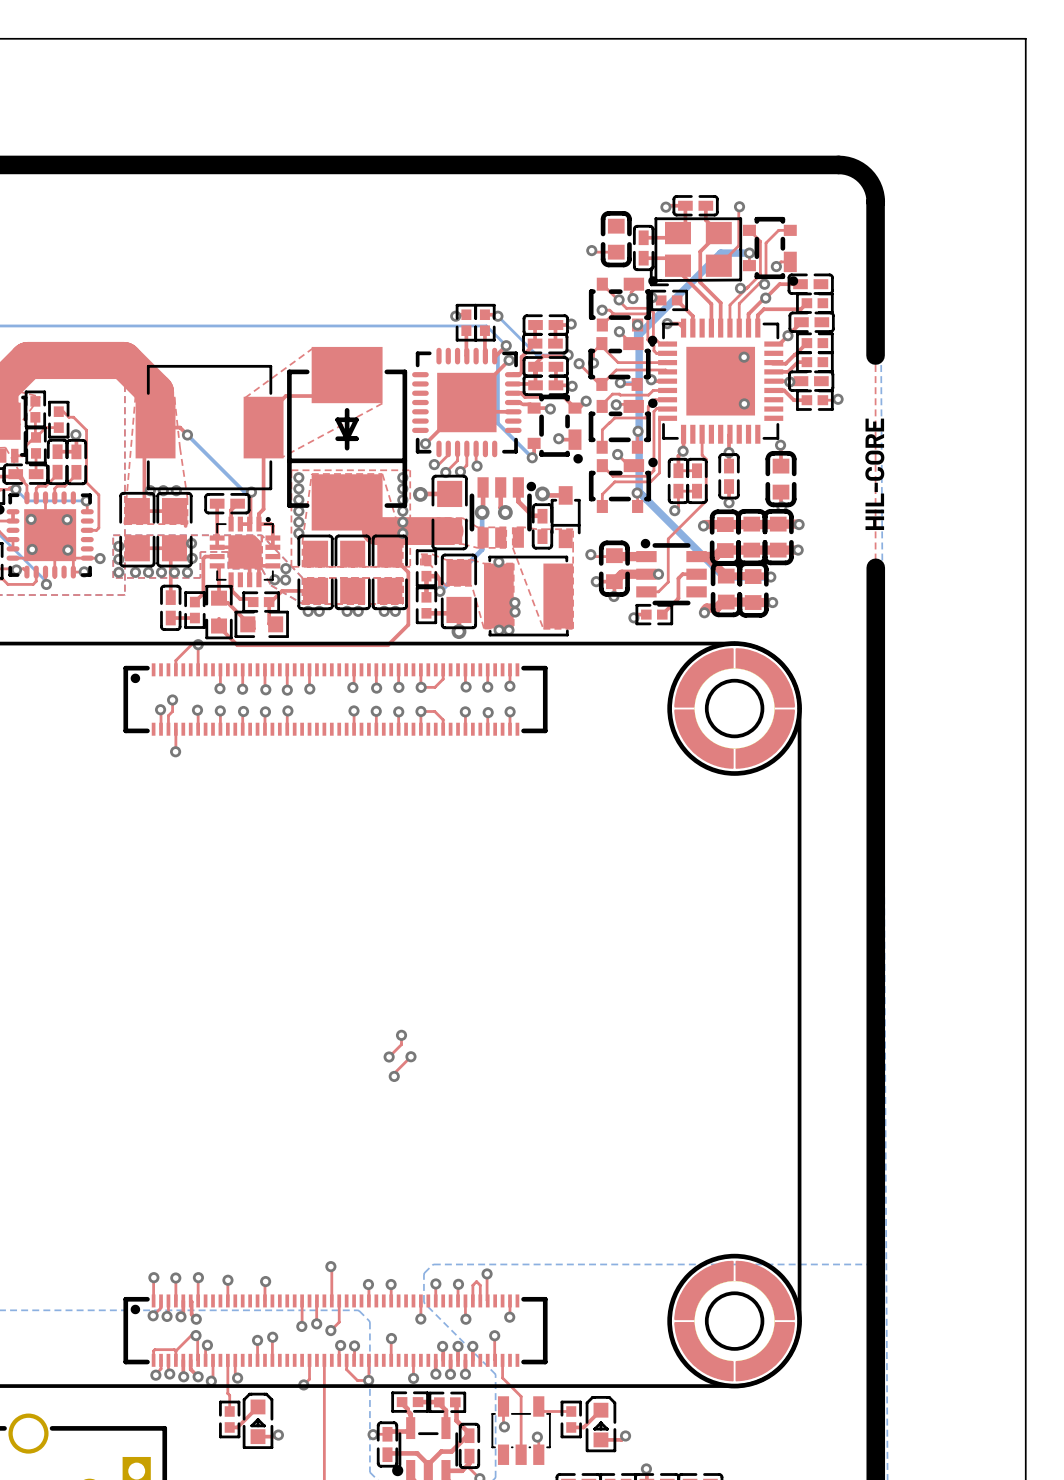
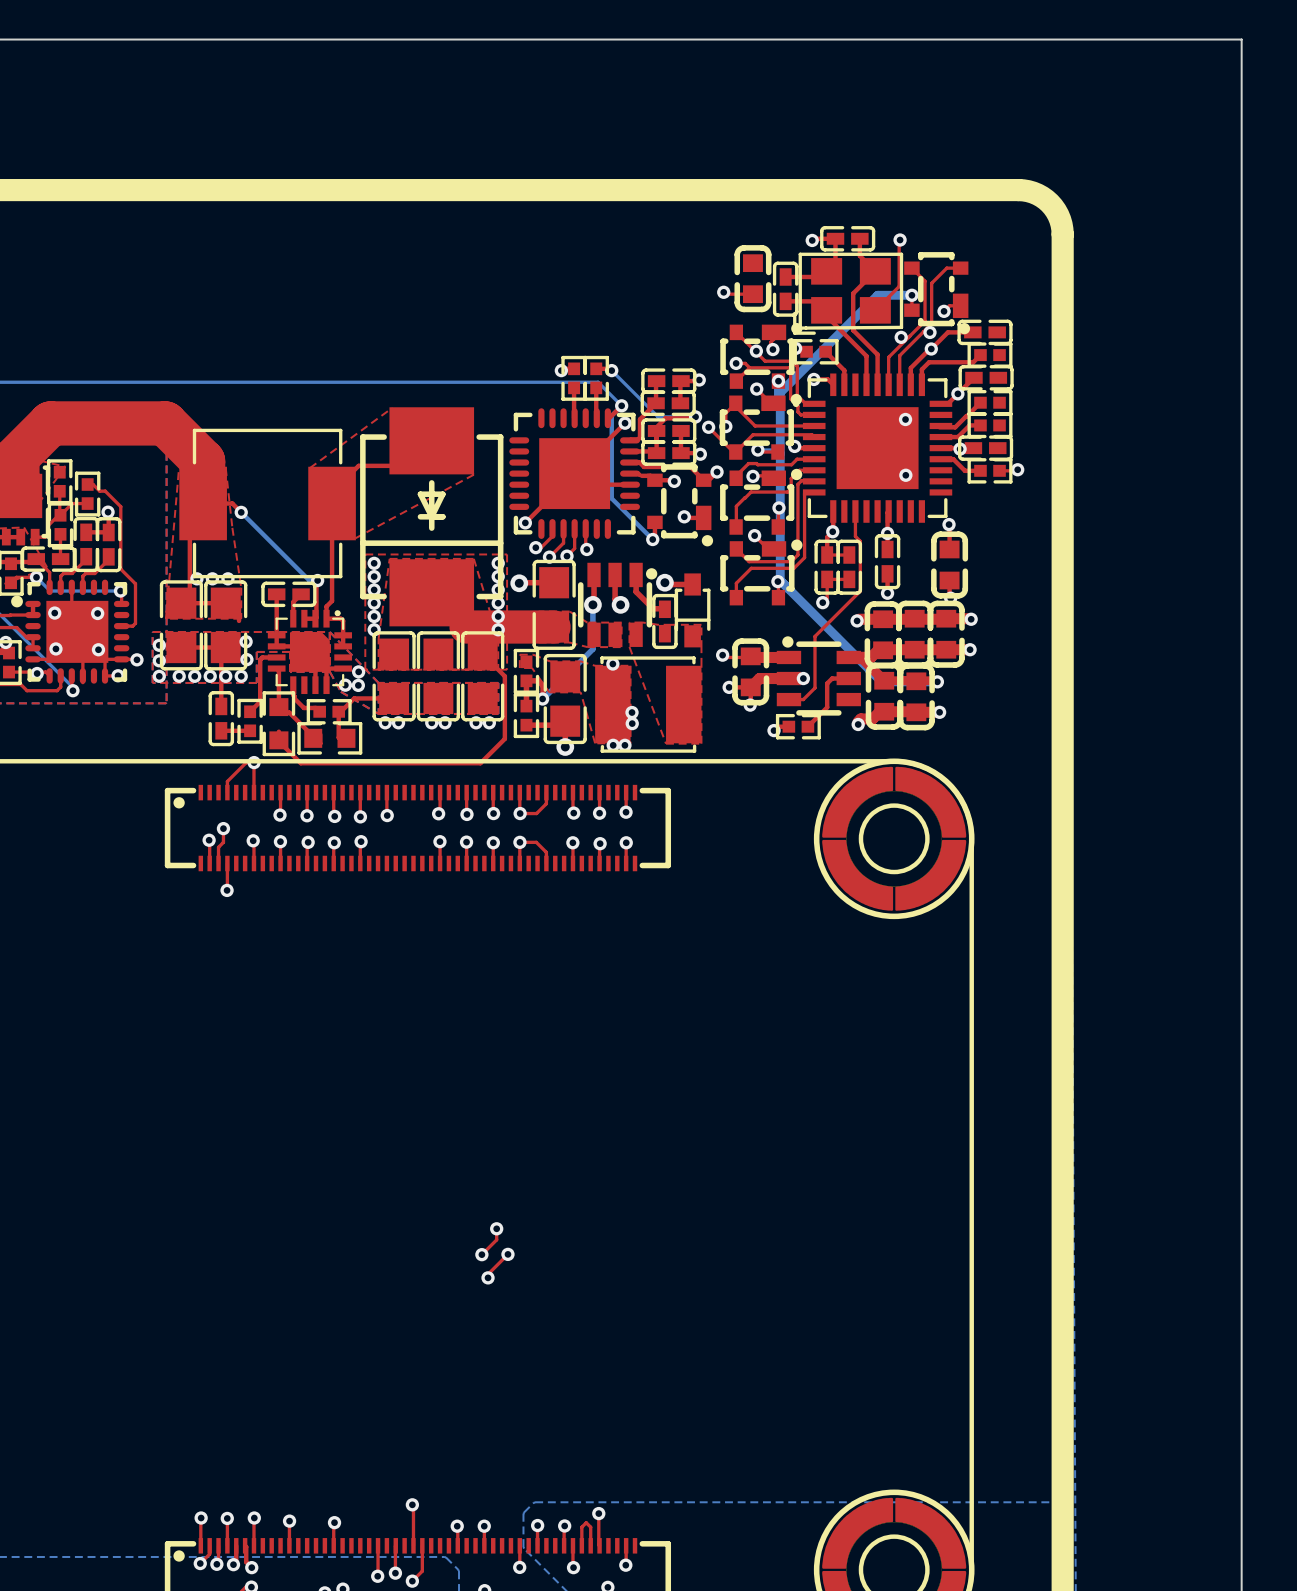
line: (875, 202) (875, 355) -> (1062, 234) (1062, 670)
text: HIL-CORE (874, 474) -> none

